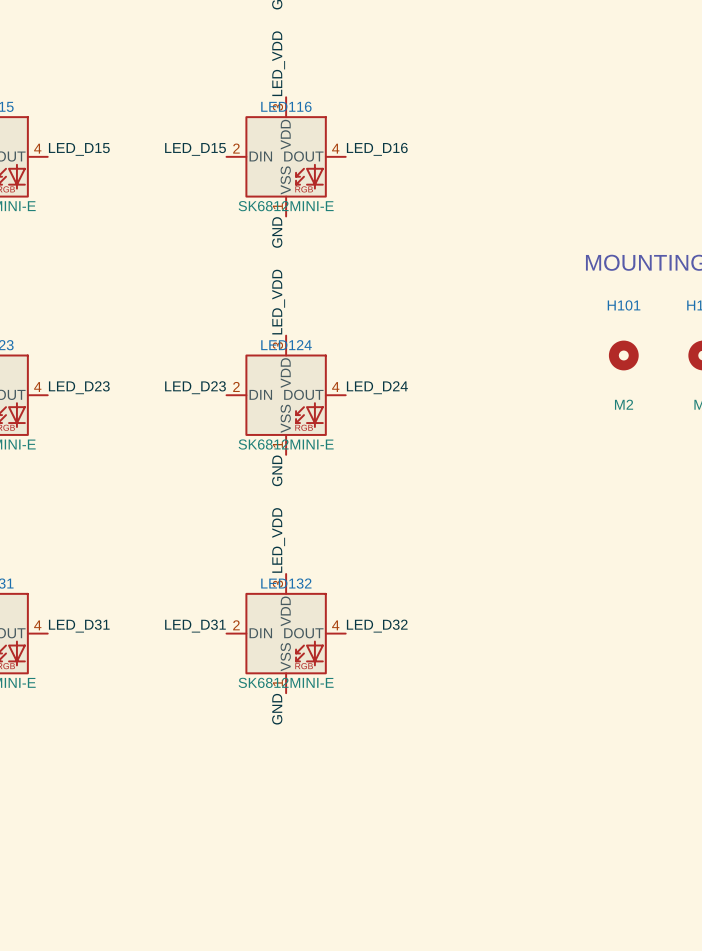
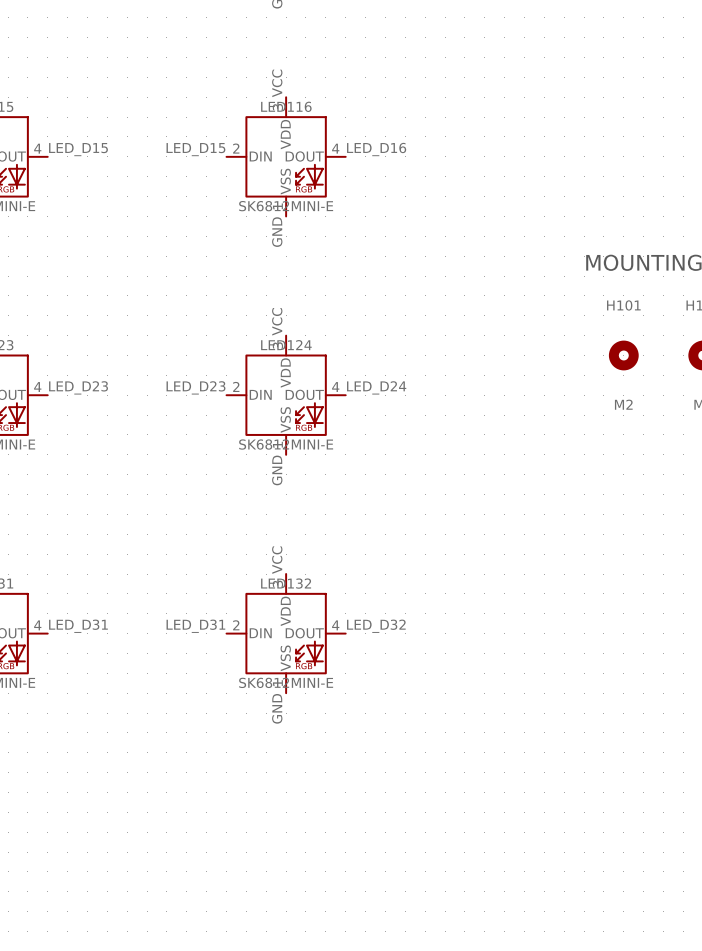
label: LED_VDD (278, 63) -> VCC (277, 83)
label: LED_VDD (278, 302) -> VCC (277, 321)
label: LED_VDD (278, 540) -> VCC (277, 560)

